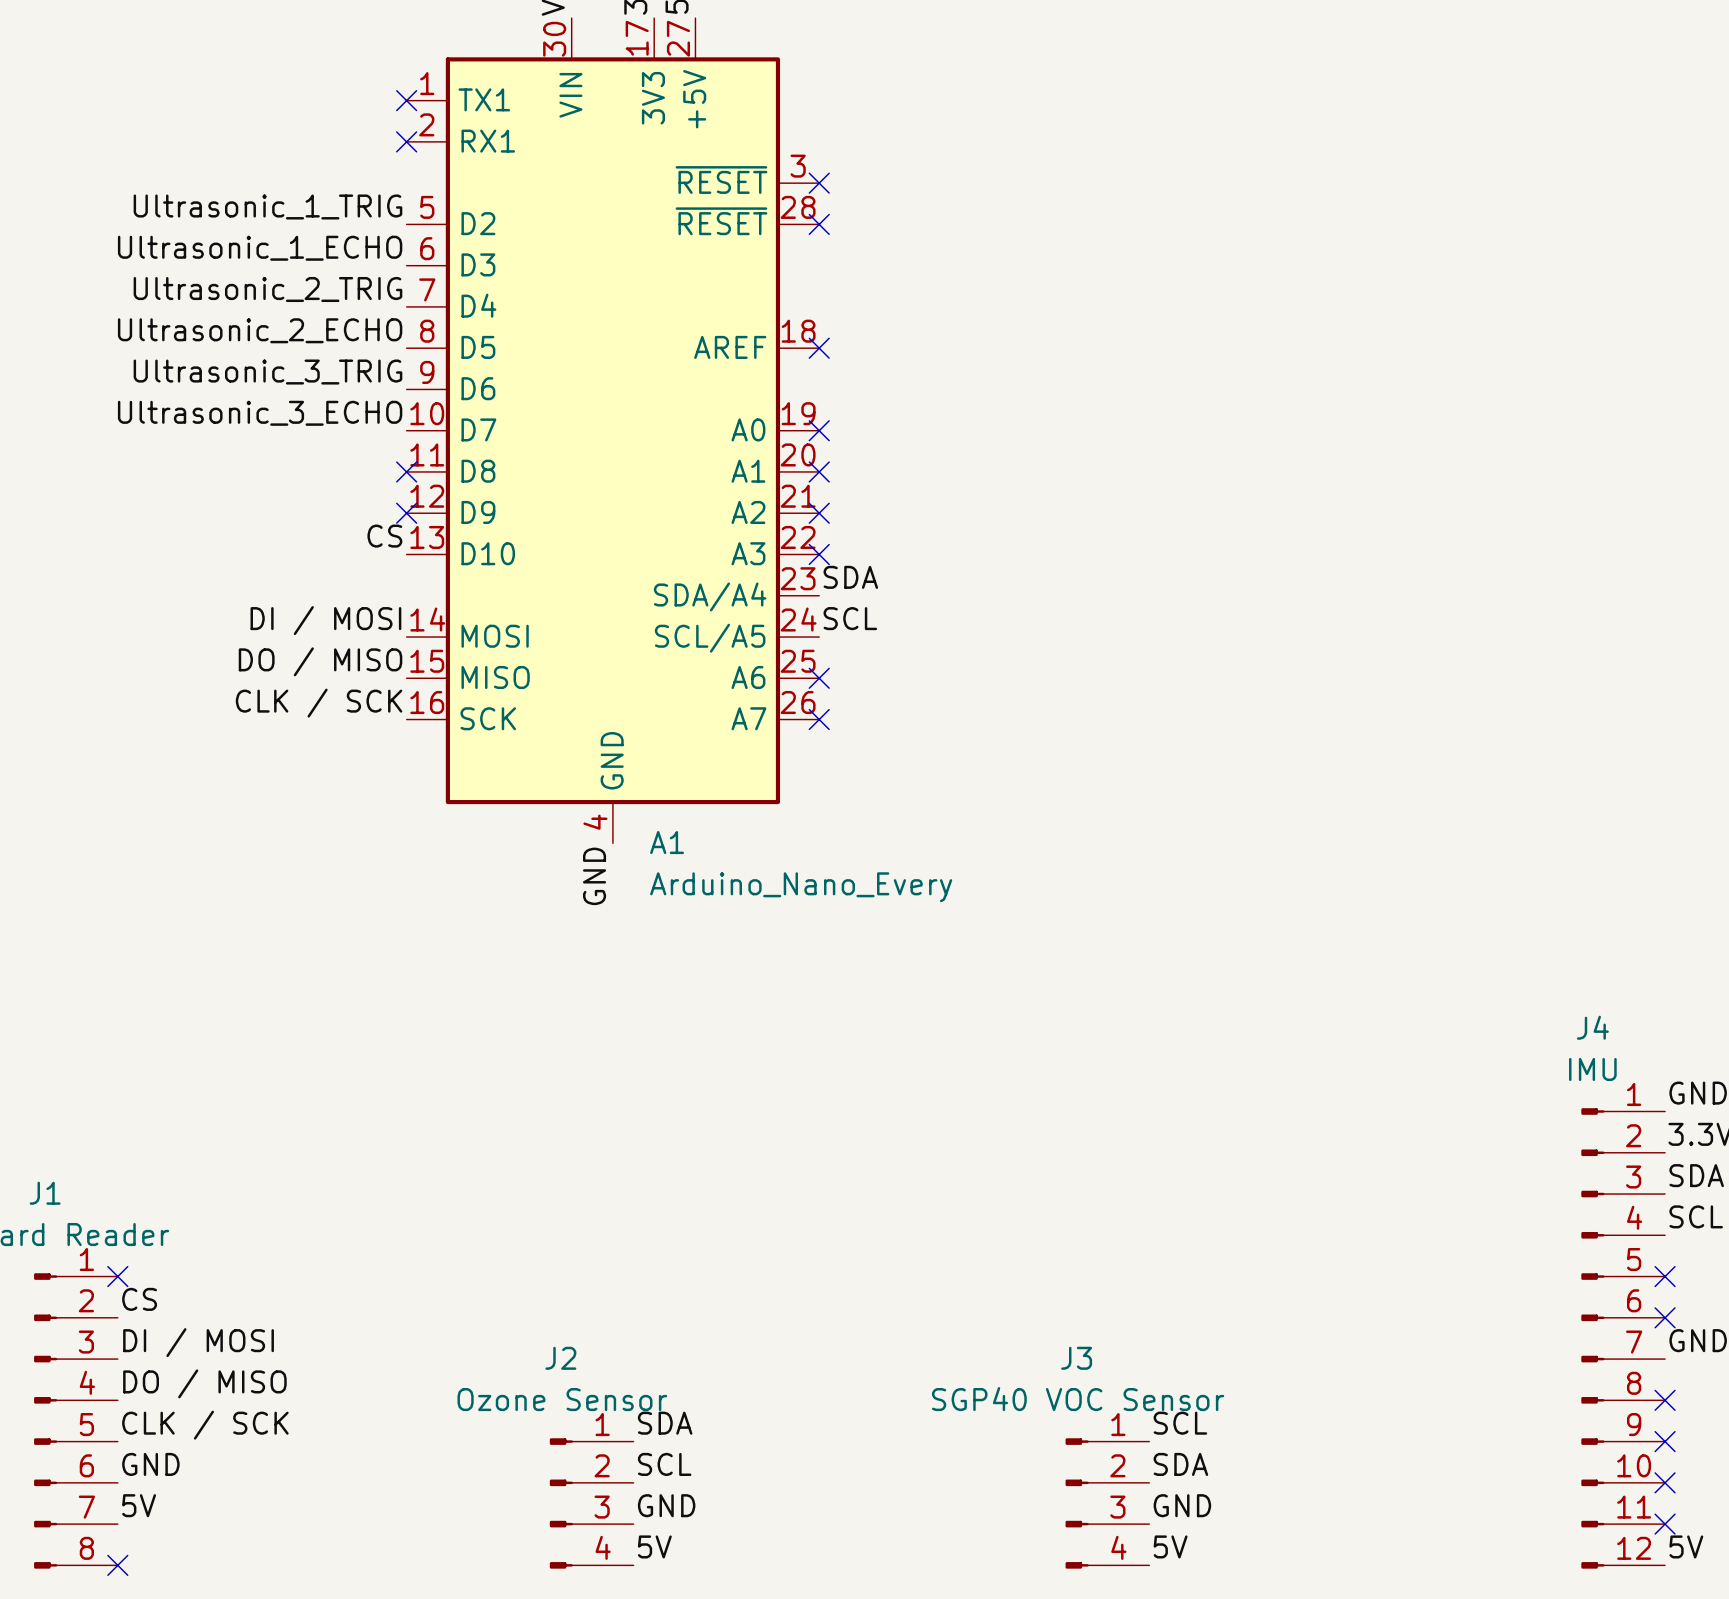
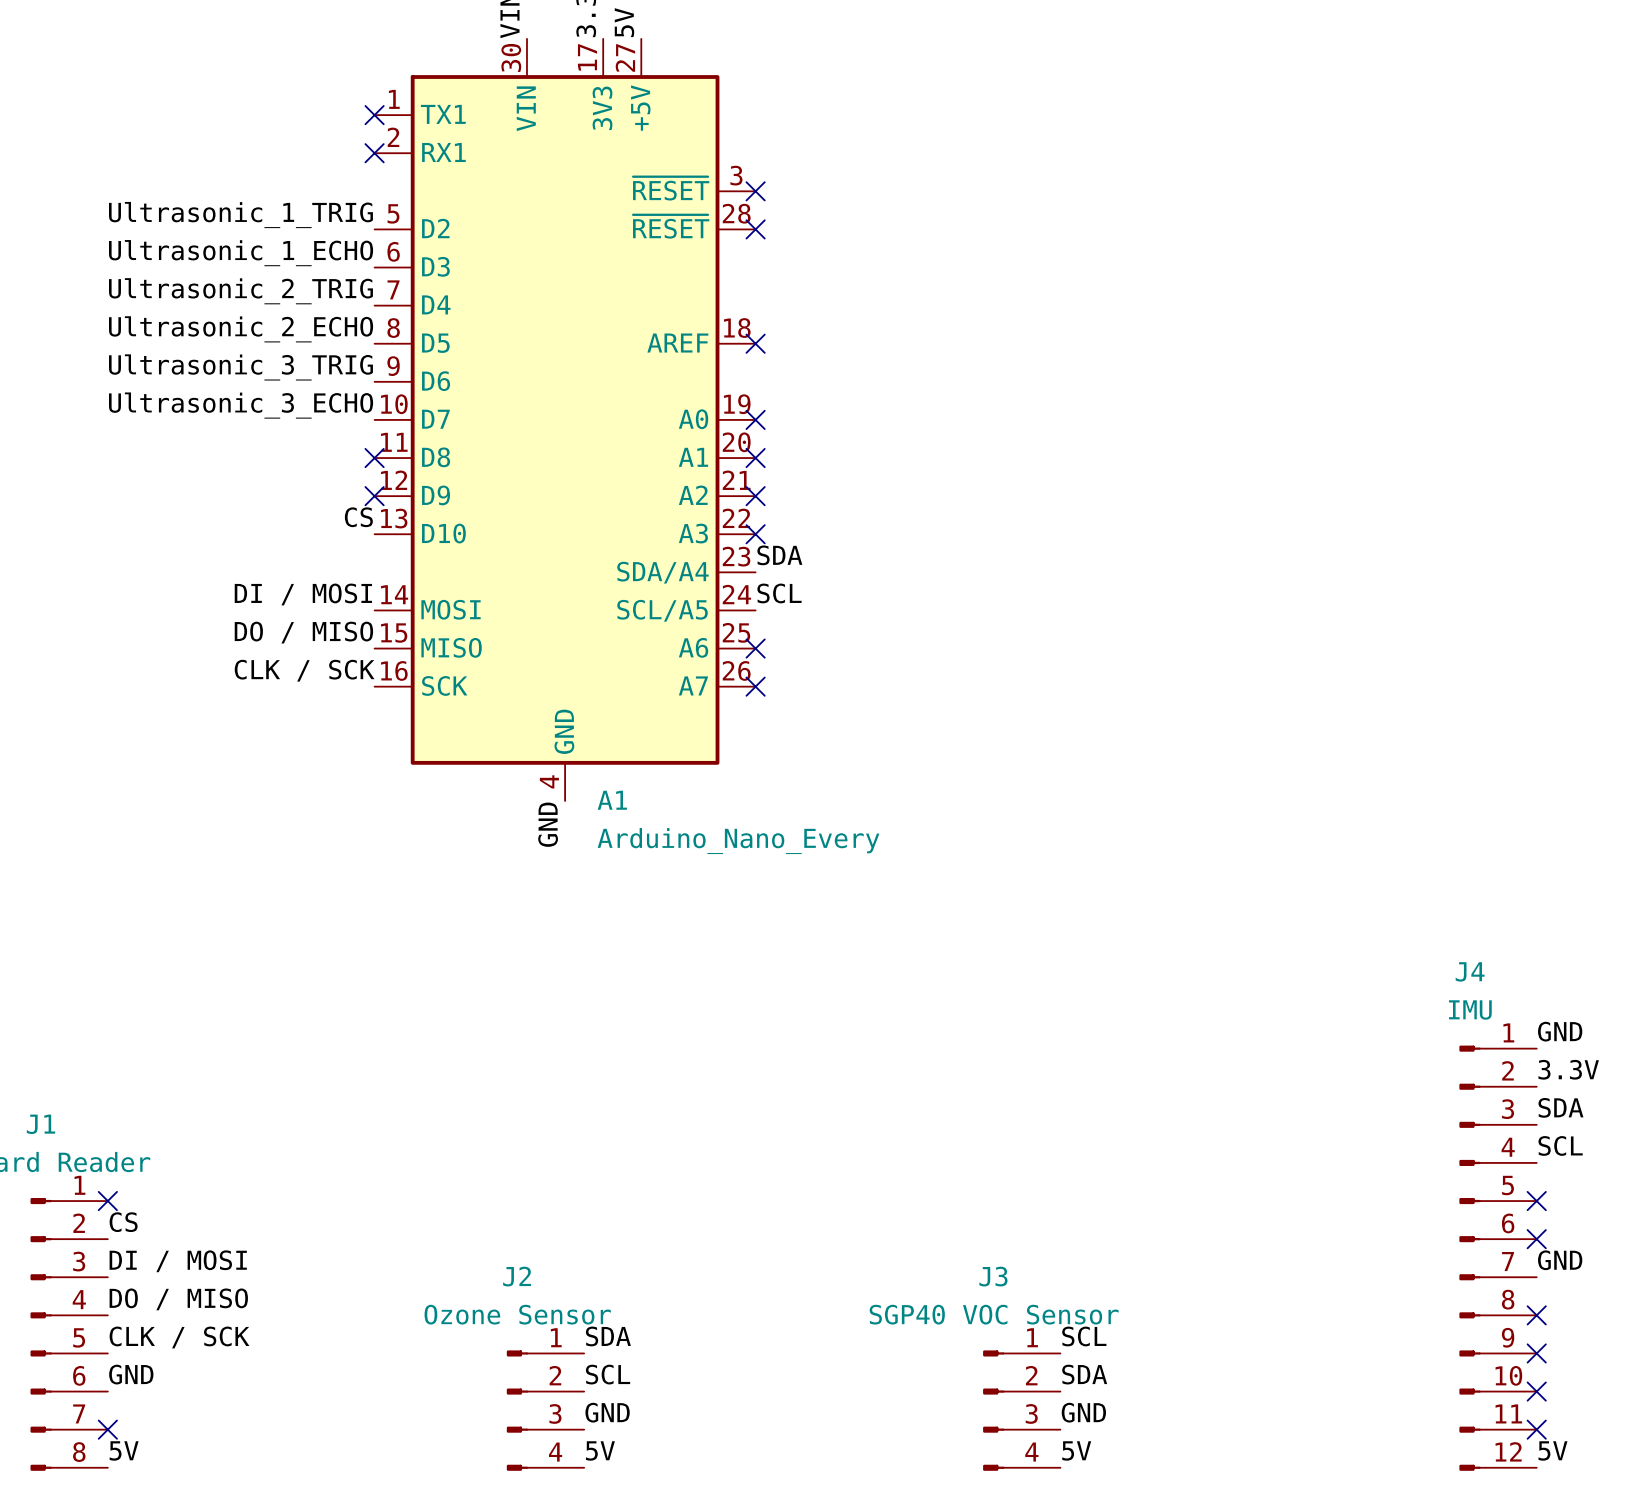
label position: 5V (139, 1505) -> 5V (124, 1450)
no-connect mark position: (117, 1565) -> (107, 1429)

